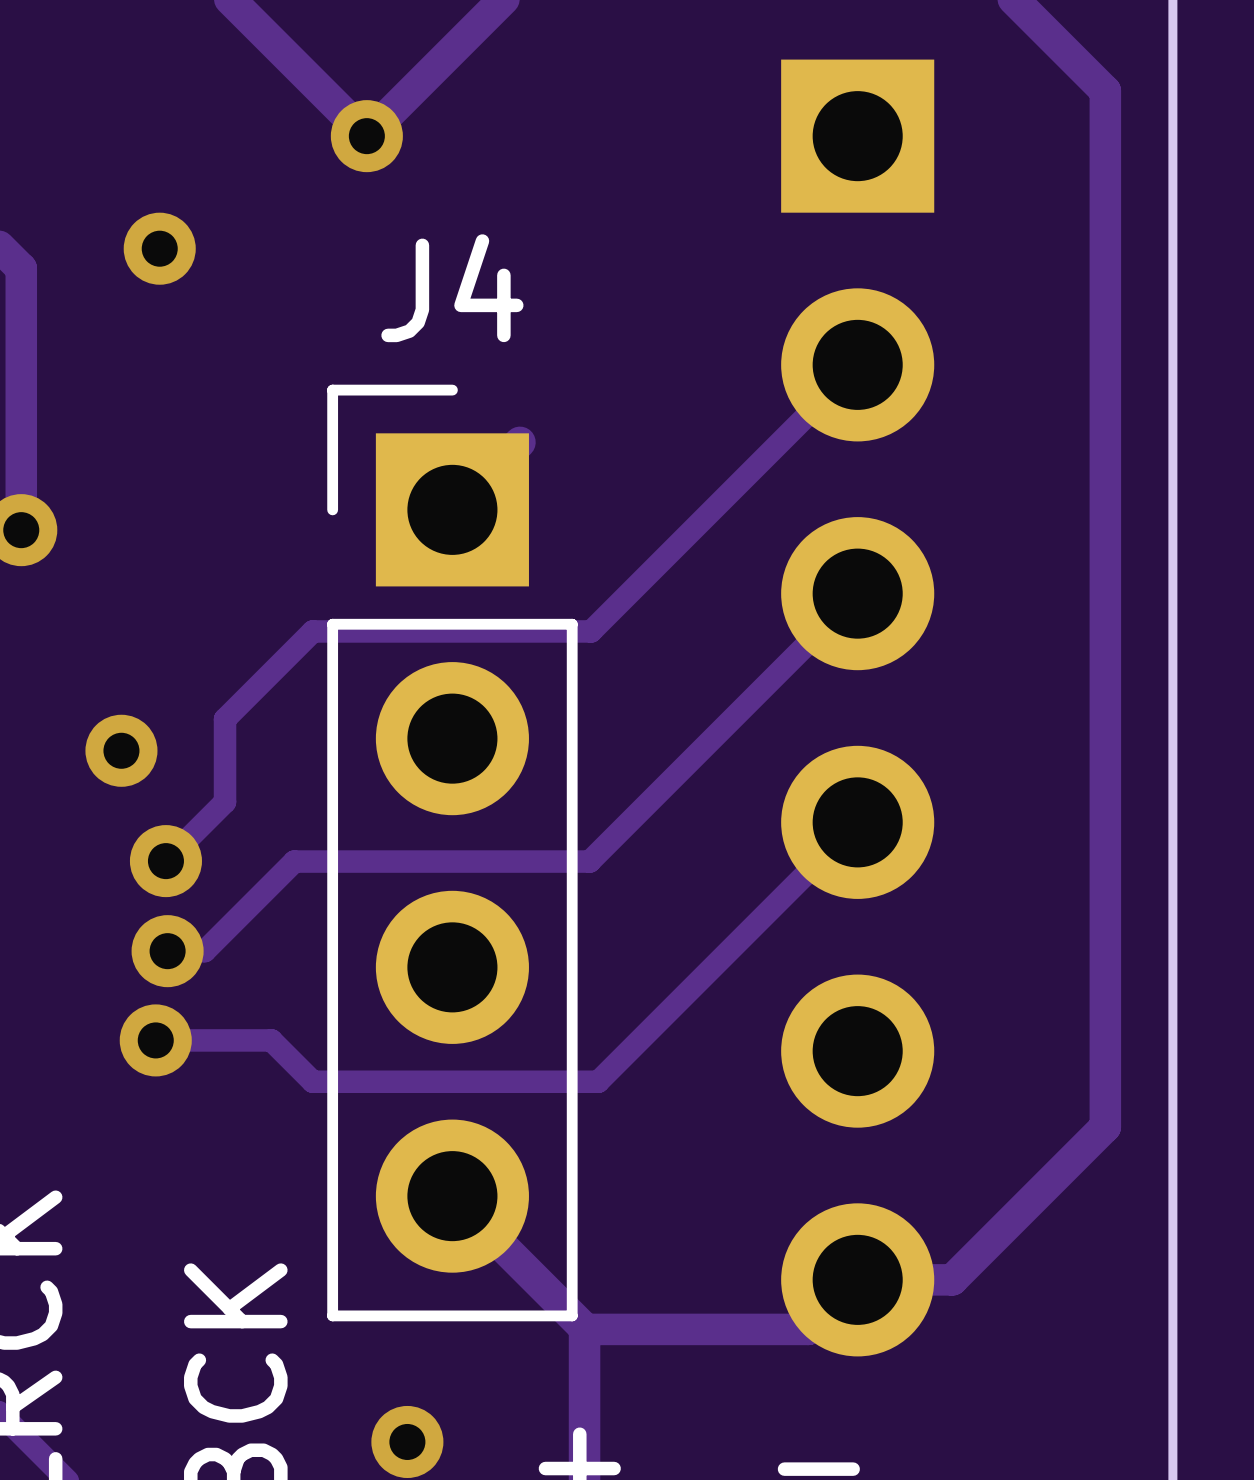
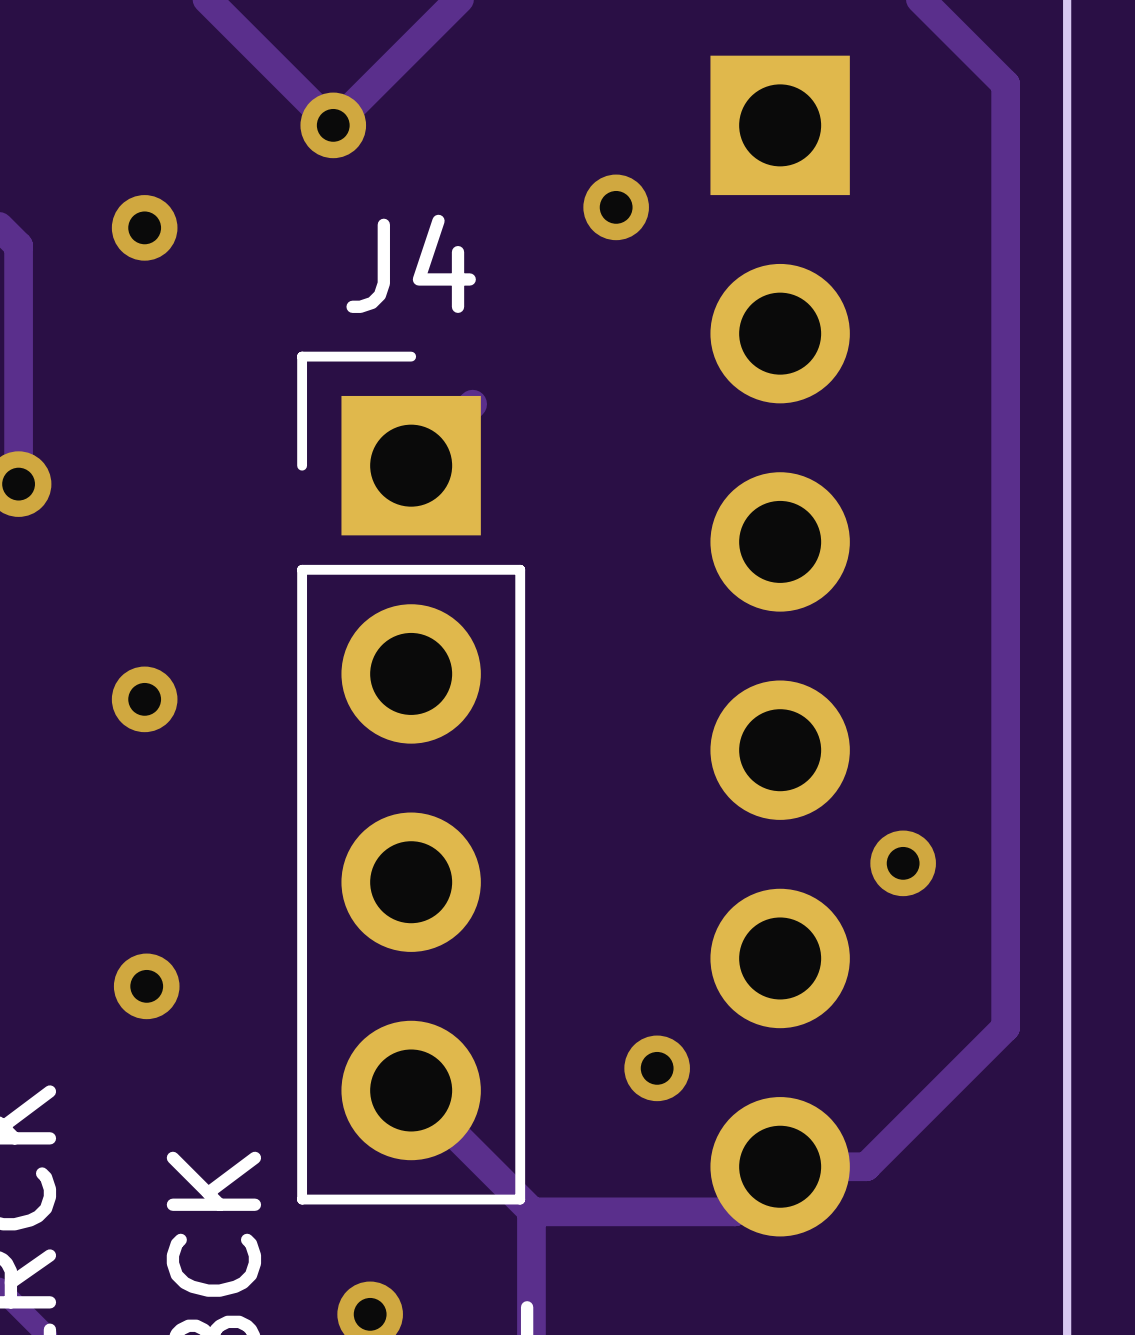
via: none -> (616, 207)
track: (857, 364) (591, 631) (312, 631) (225, 719) (225, 802) (165, 861) -> none
track: (857, 593) (589, 861) (294, 861) (204, 951) (167, 951) -> none
via position: (121, 750) -> (144, 699)
track: (857, 822) (598, 1081) (312, 1081) (271, 1040) (155, 1040) -> none
via: (165, 861) -> none
via: none -> (903, 863)
via: (167, 951) -> none
via position: (155, 1040) -> (146, 986)
via: none -> (657, 1068)

